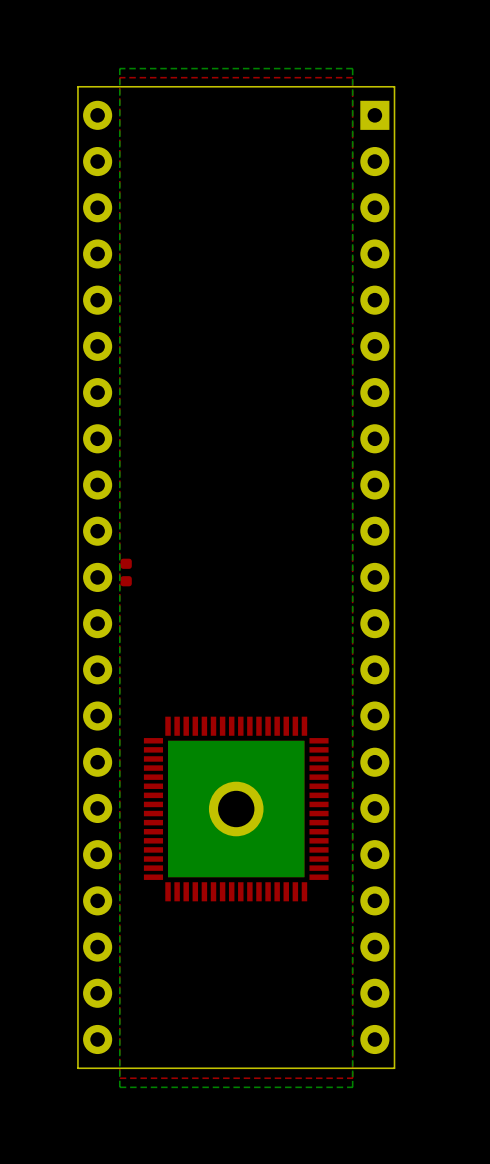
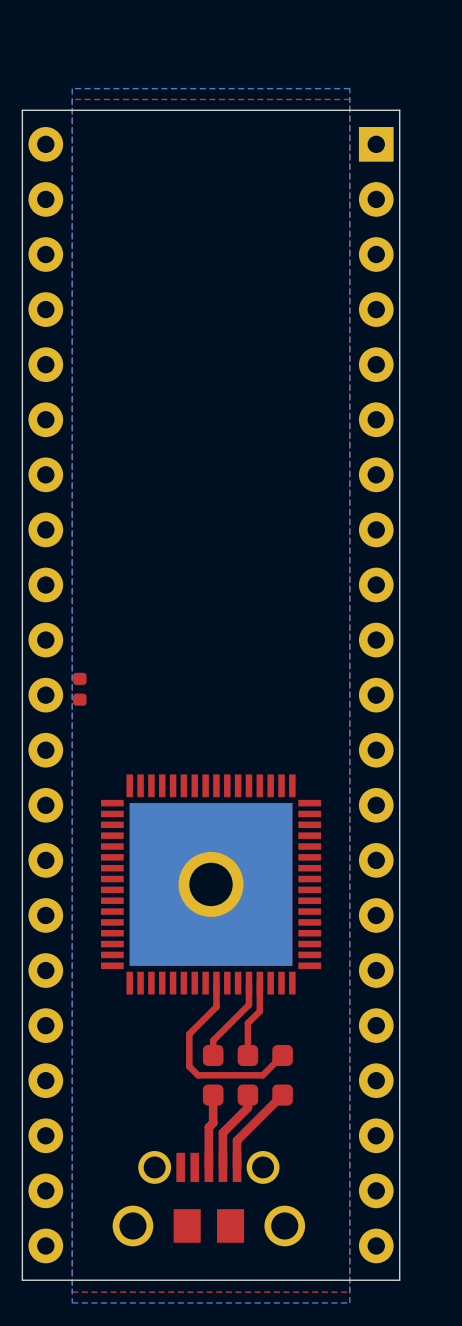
part position: (236, 809) -> (211, 884)
top track: none -> (216, 983) (216, 1006) (189, 1034) (189, 1066) (198, 1075) (262, 1075) (282, 1055)
top track: none -> (248, 983) (248, 1004) (213, 1040) (213, 1055)
top track: none -> (259, 983) (259, 1011) (247, 1023) (247, 1055)
part: none -> (213, 1075)
part: none -> (247, 1075)
part: none -> (282, 1075)
top track: none -> (213, 1095) (213, 1122) (208, 1127) (208, 1167)
top track: none -> (247, 1095) (247, 1107) (222, 1132) (222, 1167)
top track: none -> (282, 1095) (237, 1140) (237, 1167)
part: none -> (208, 1198)

